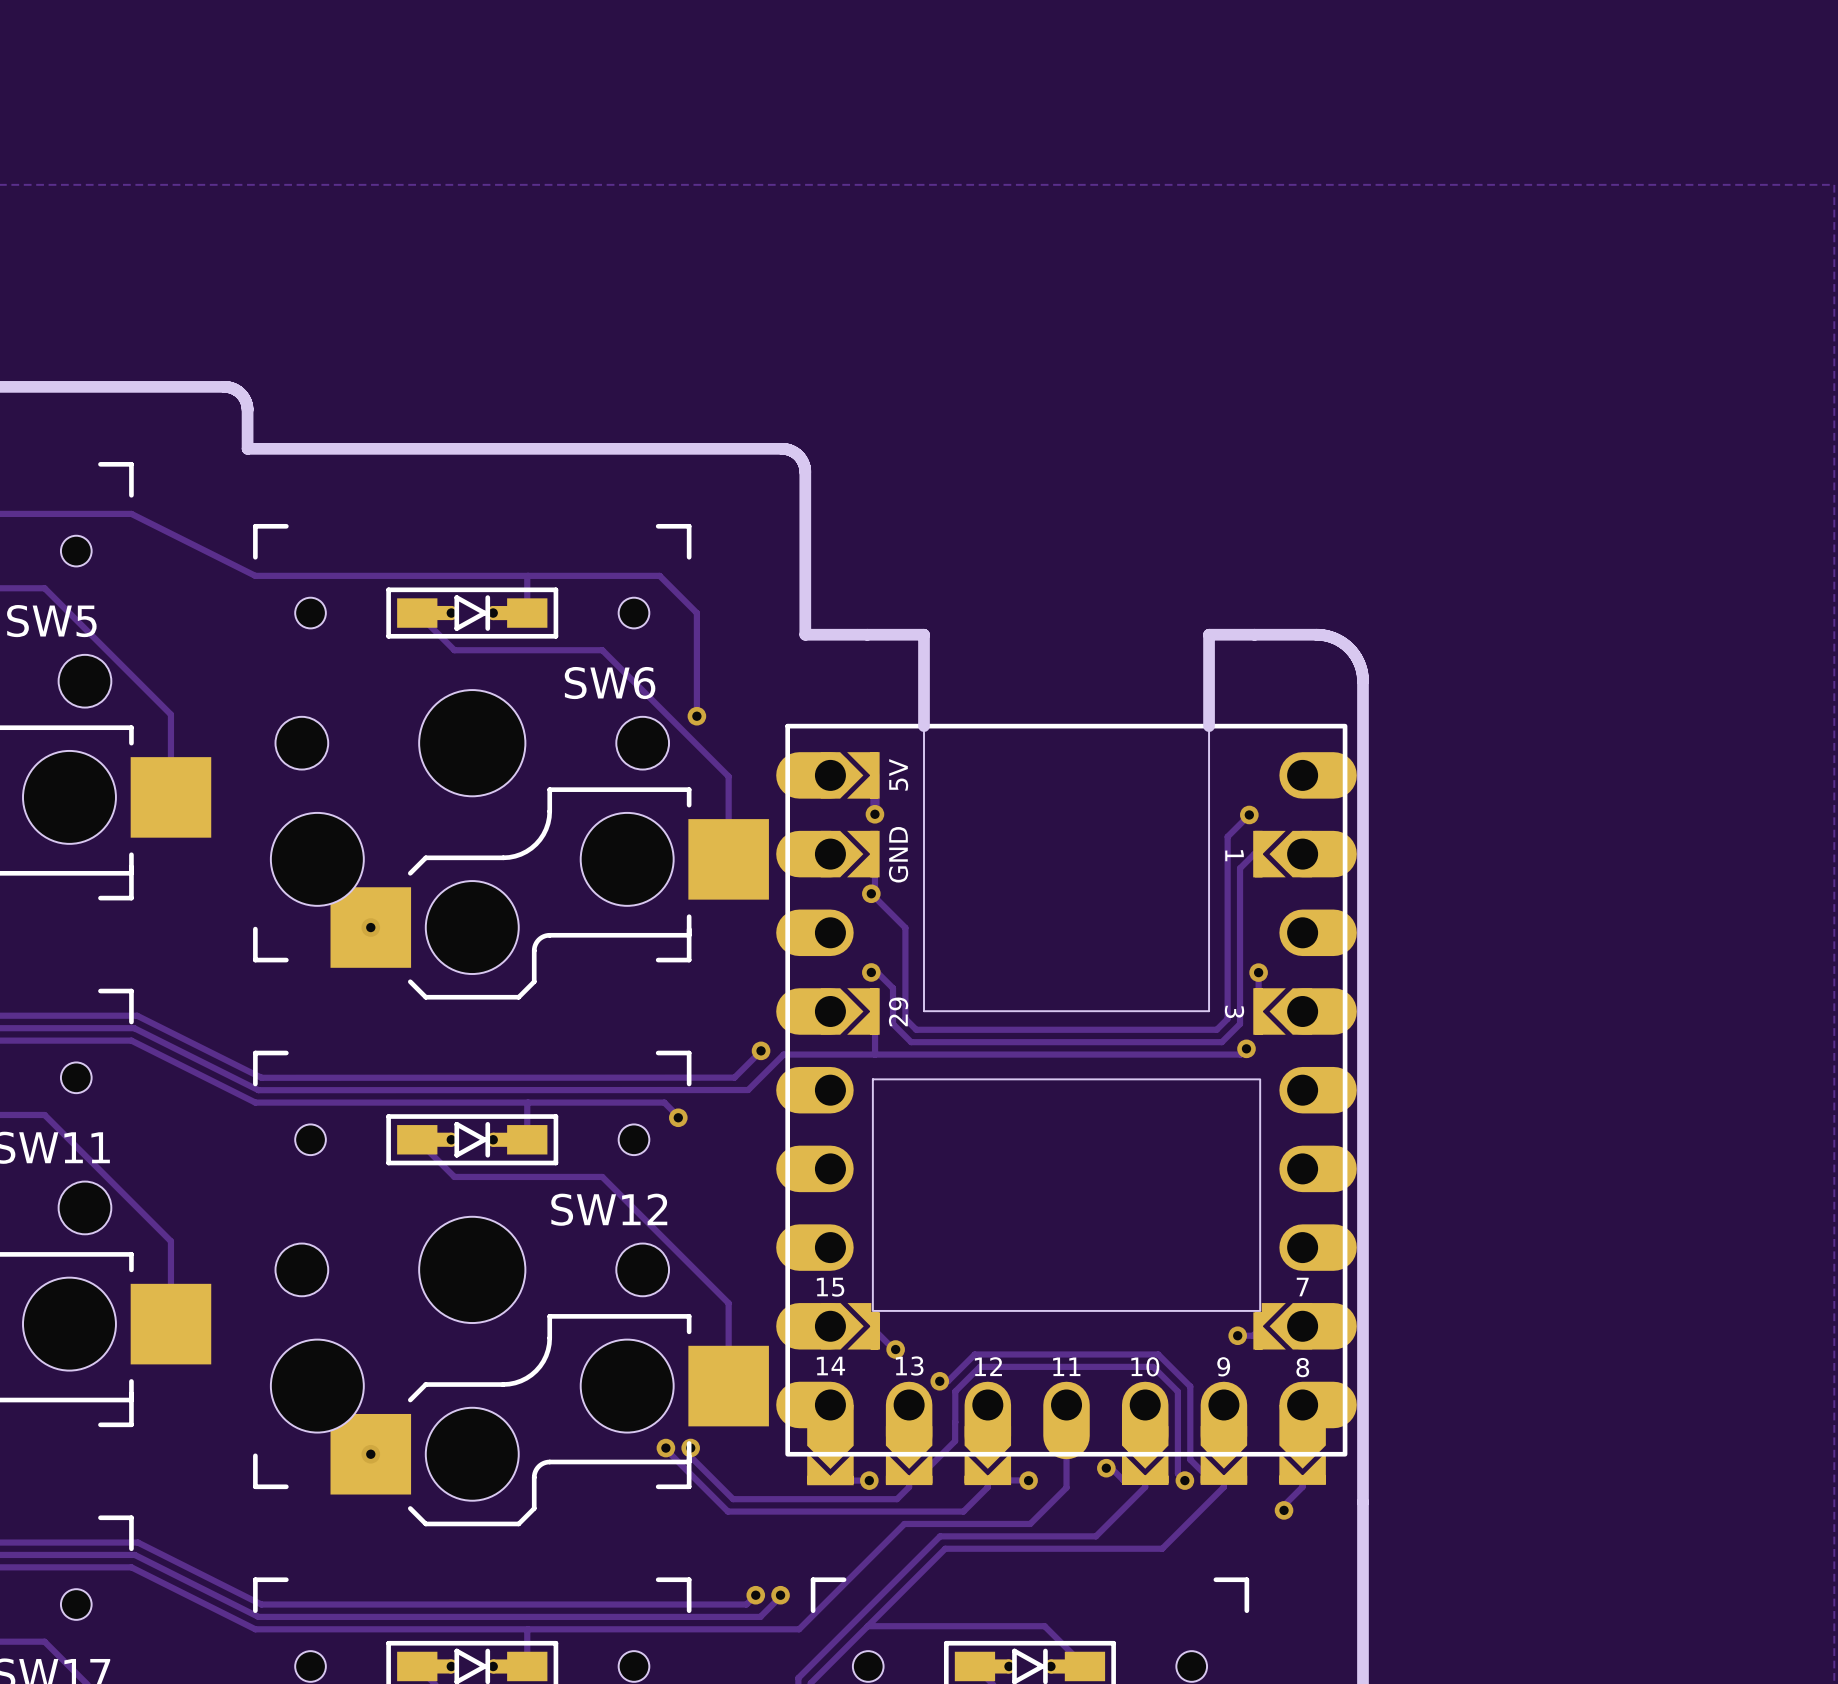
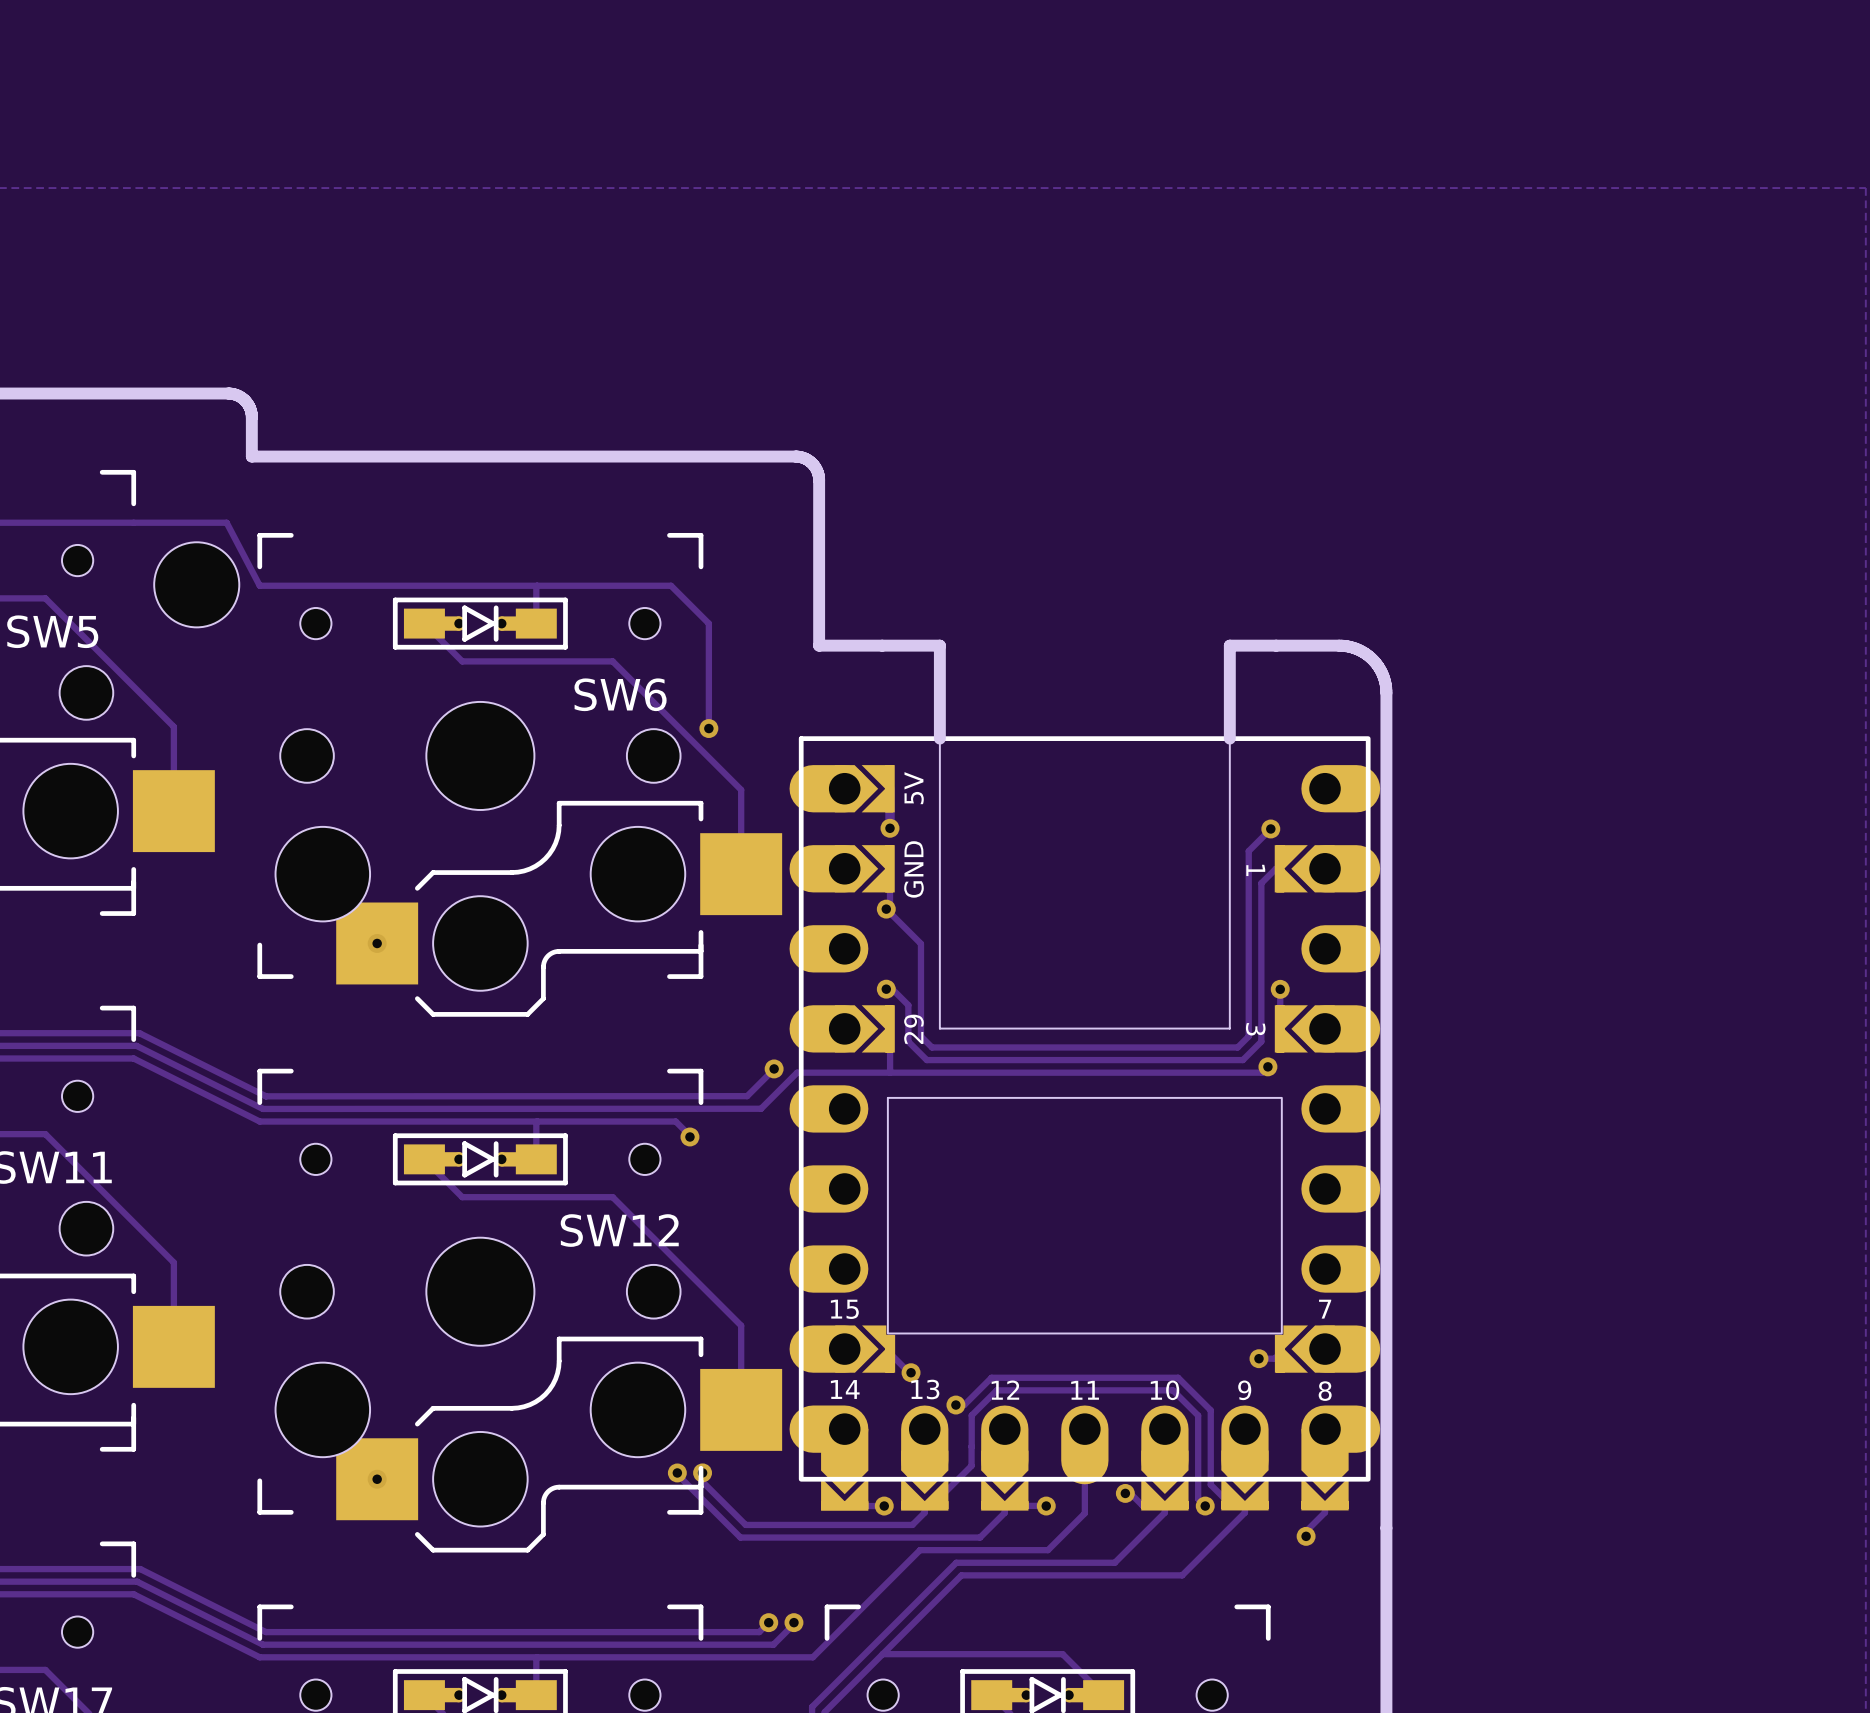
track: (131, 513) (255, 575) -> (133, 522) (226, 522) (259, 585)
part: none -> (196, 584)

